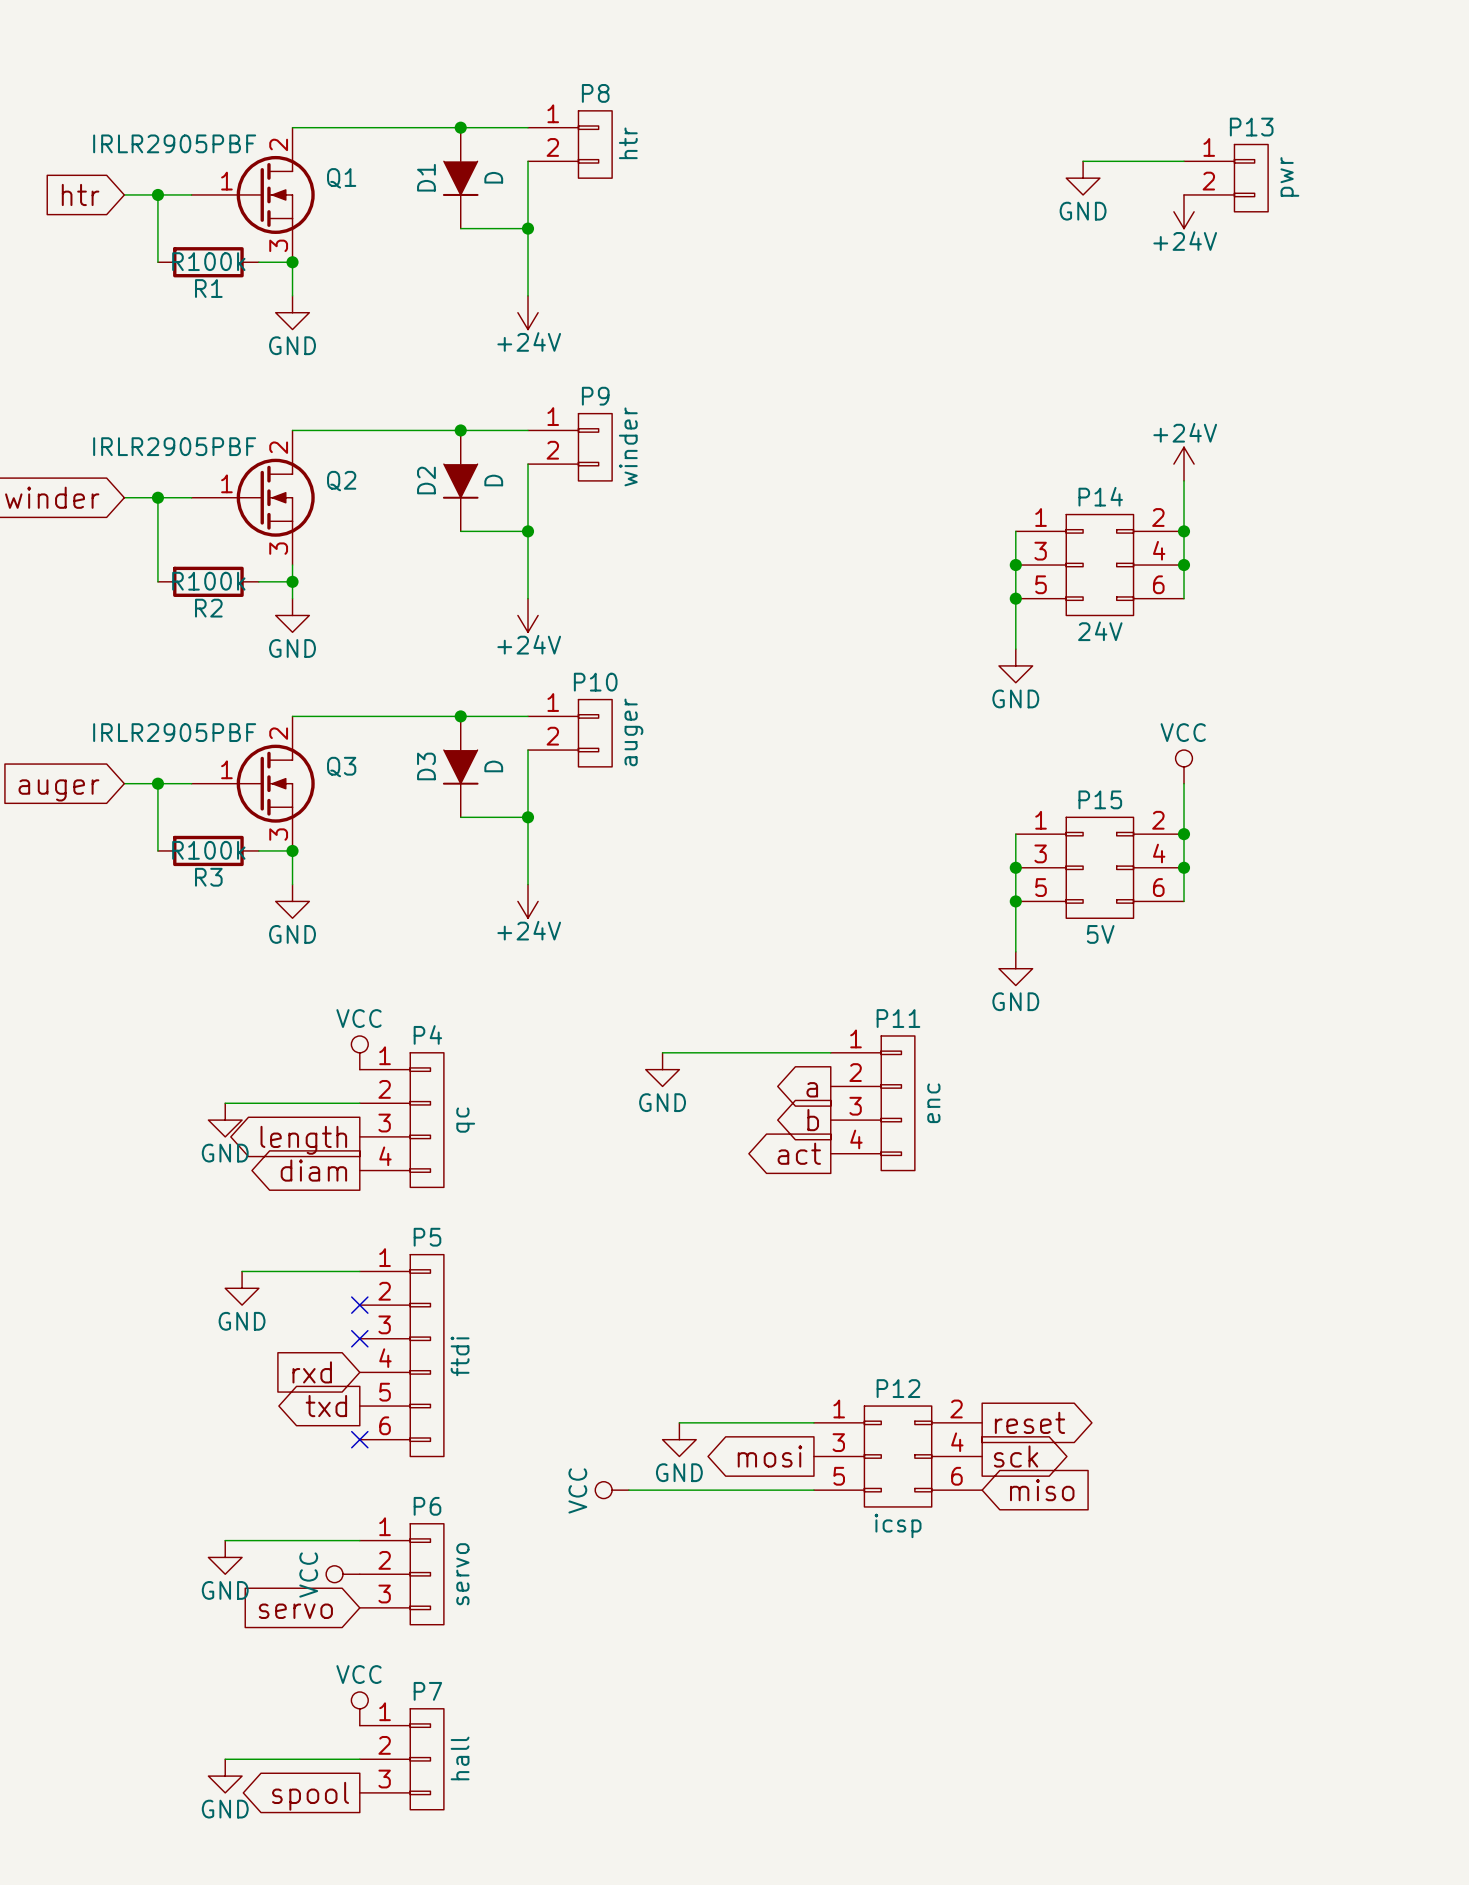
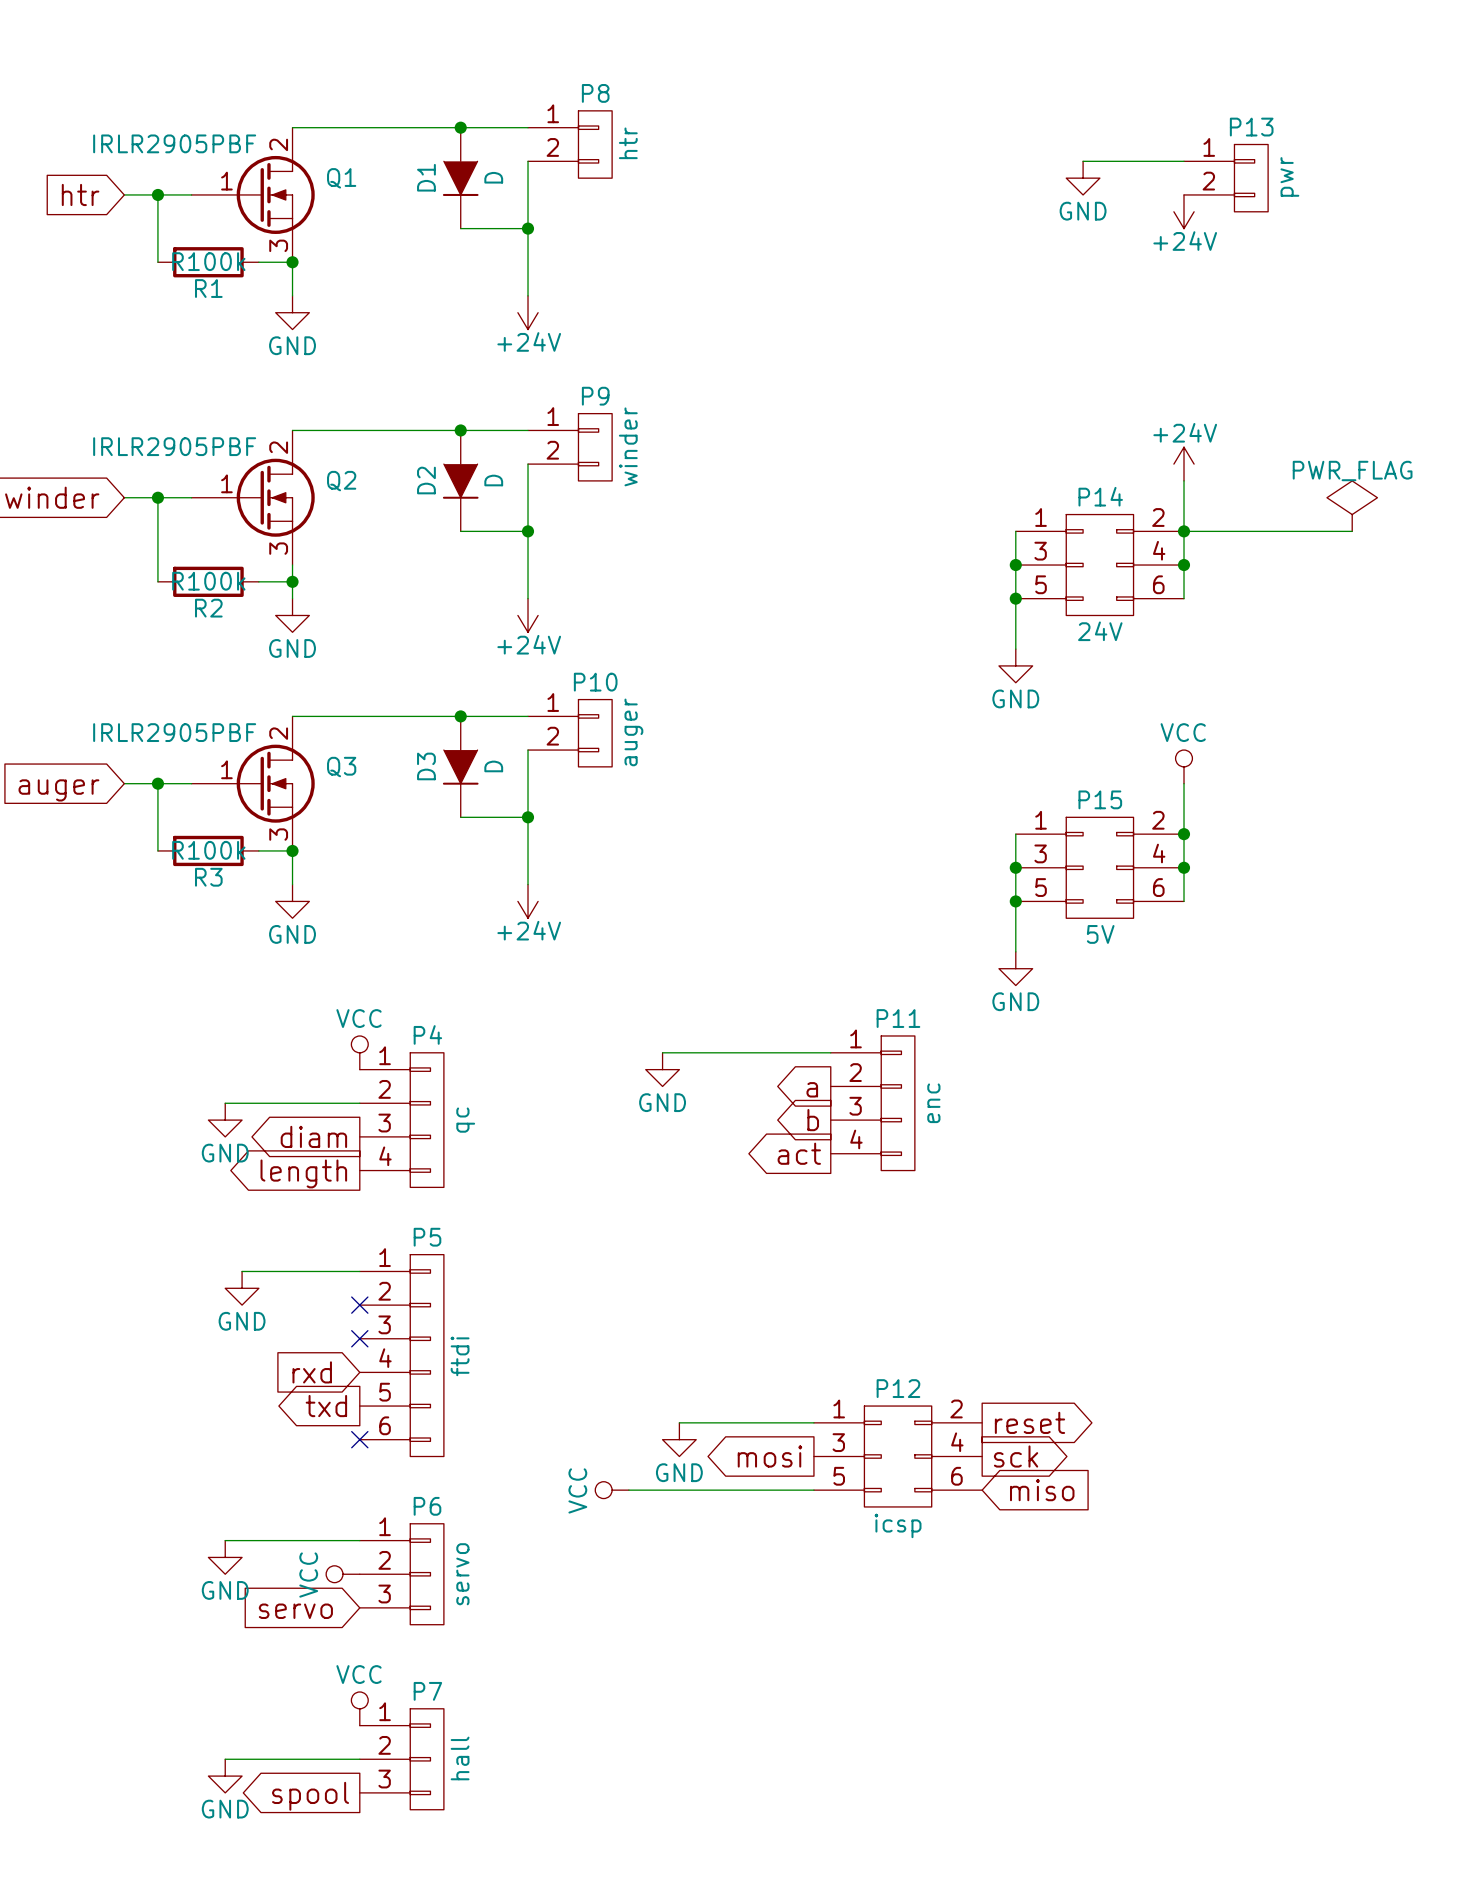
power symbol: none -> PWR_FLAG (1352, 506)
wire: none -> (1184, 531) (1352, 531)
global label: length (303, 1140) -> diam (313, 1136)
global label: diam (313, 1170) -> length (303, 1173)

